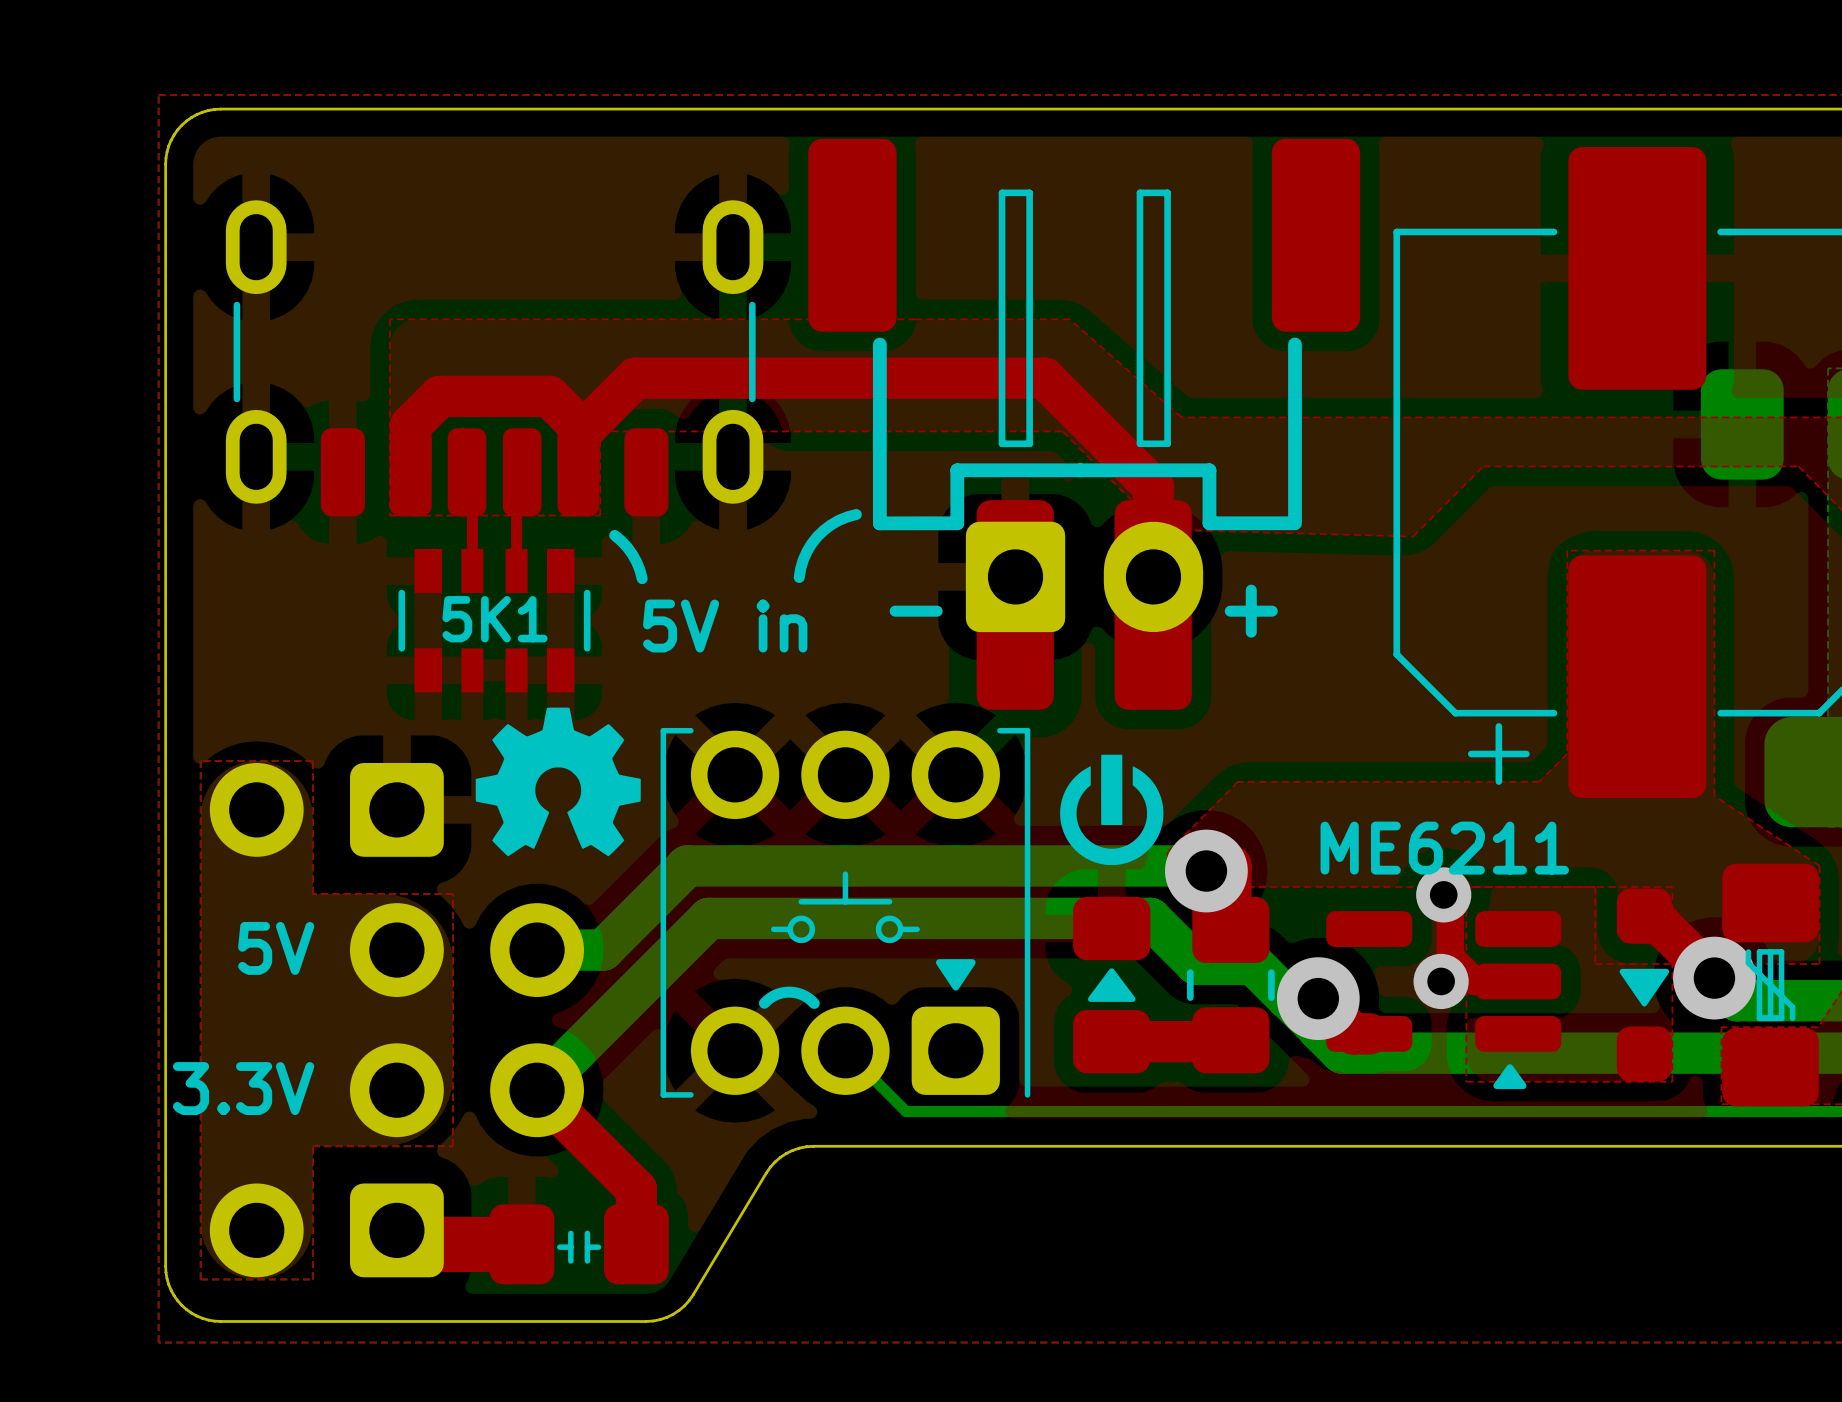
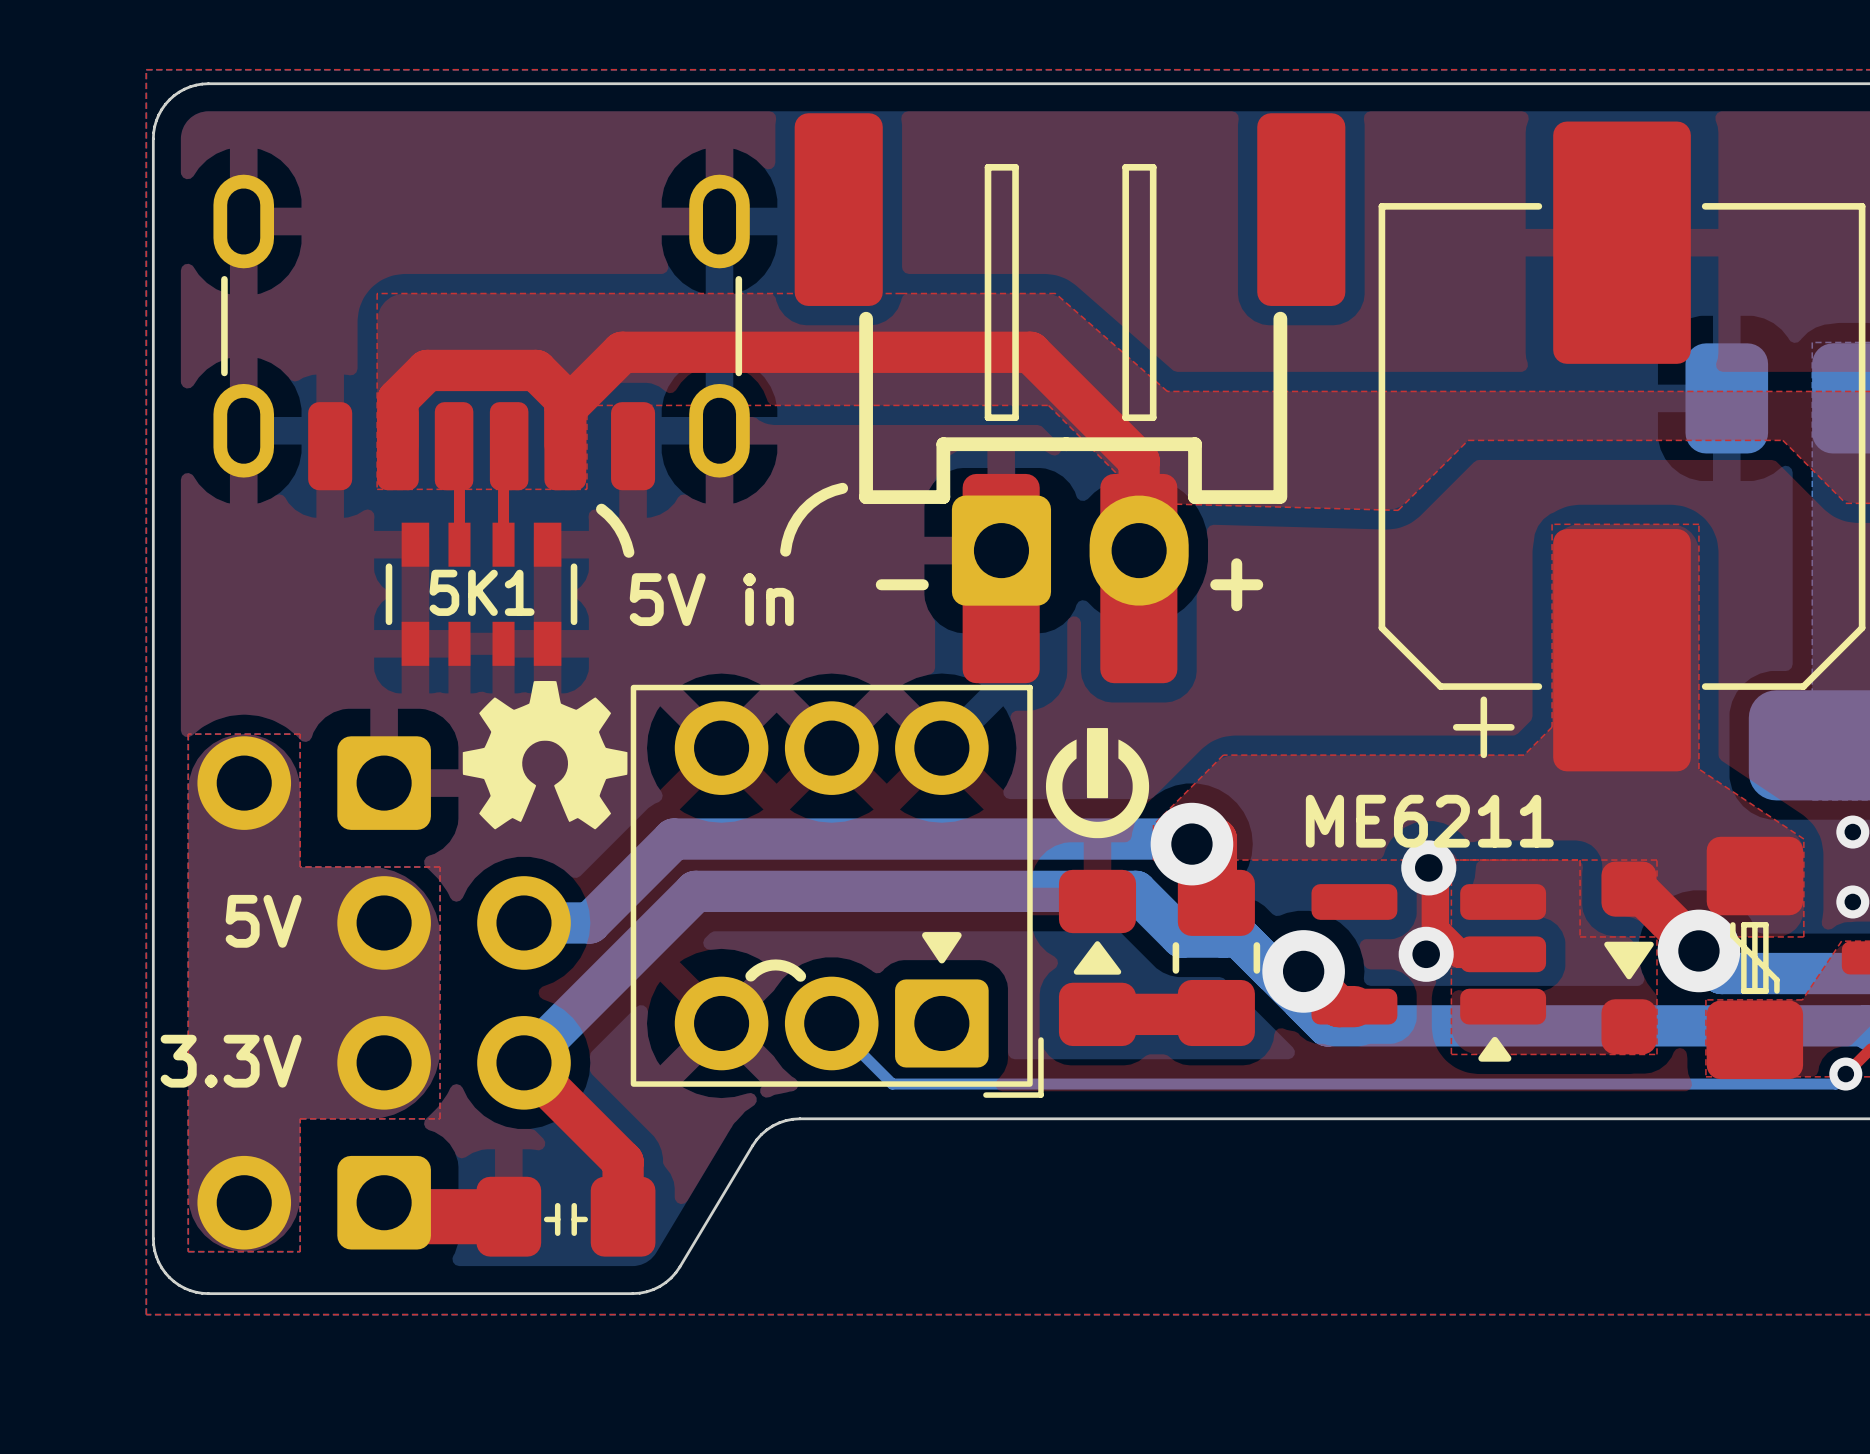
part footprint: [660, 727, 1031, 1098] -> [630, 684, 1044, 1098]

